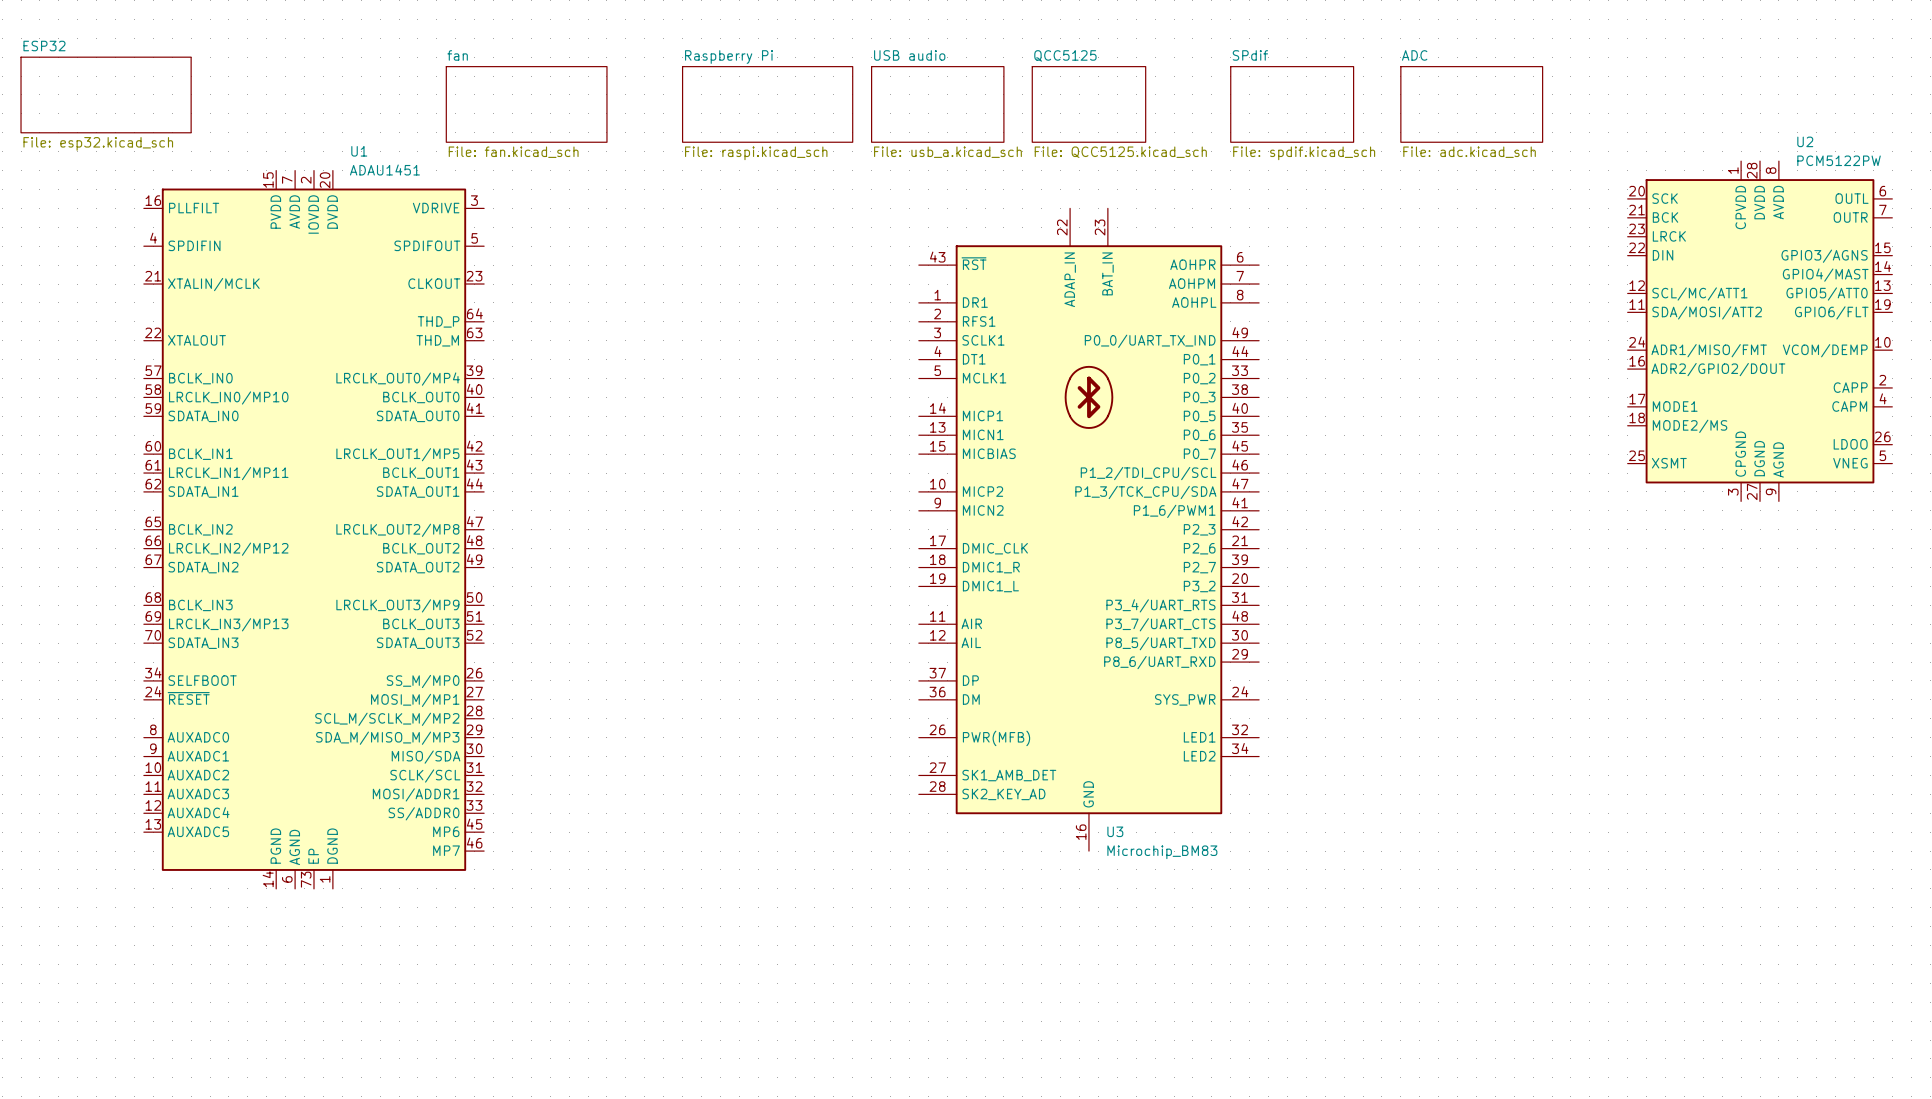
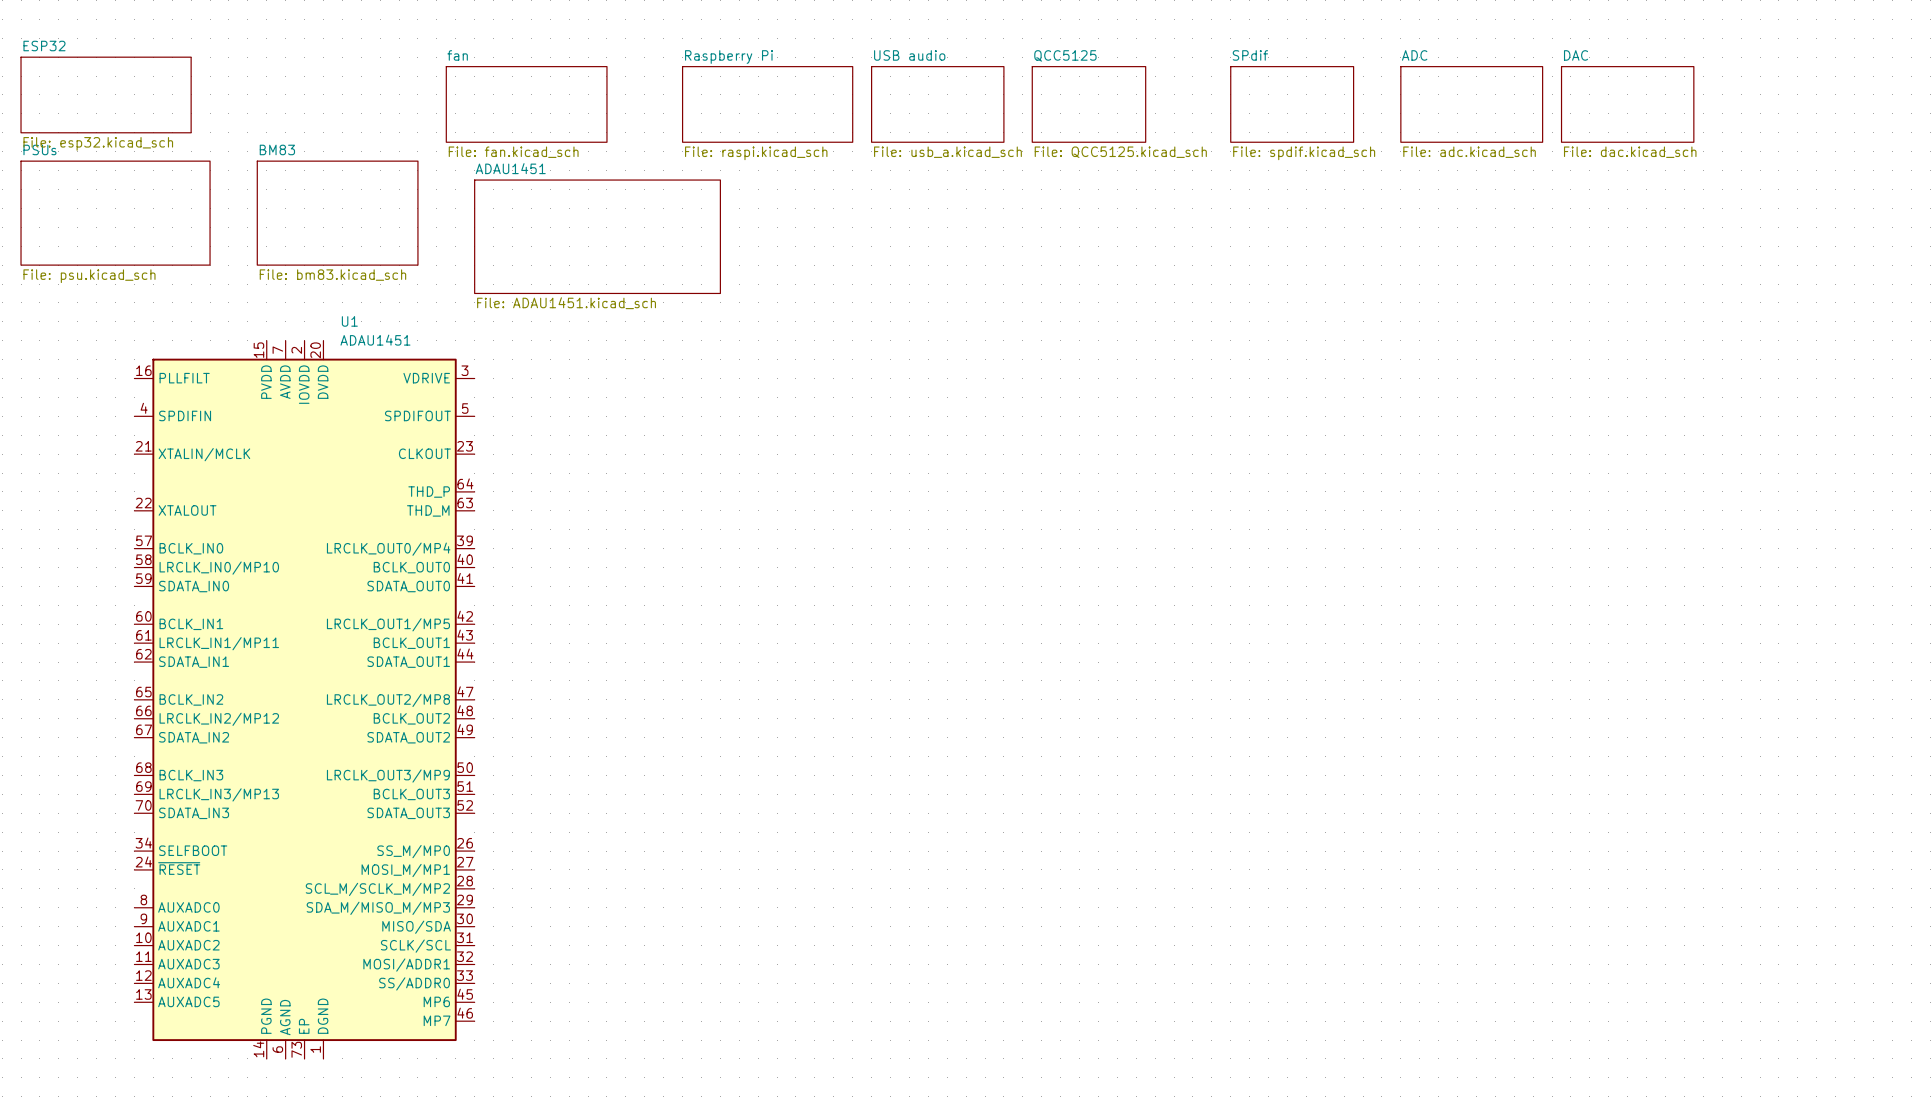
sheet DAC: none -> File: dac.kicad_sch (1627, 104)
sheet PSUs: none -> File: psu.kicad_sch (115, 213)
sheet BM83: none -> File: bm83.kicad_sch (337, 213)
sheet ADAU1451: none -> File: ADAU1451.kicad_sch (597, 236)
U2: PCM5122PW (1760, 331) -> none
U1 position: (313, 529) -> (304, 699)
U3: Microchip_BM83 (1088, 529) -> none

